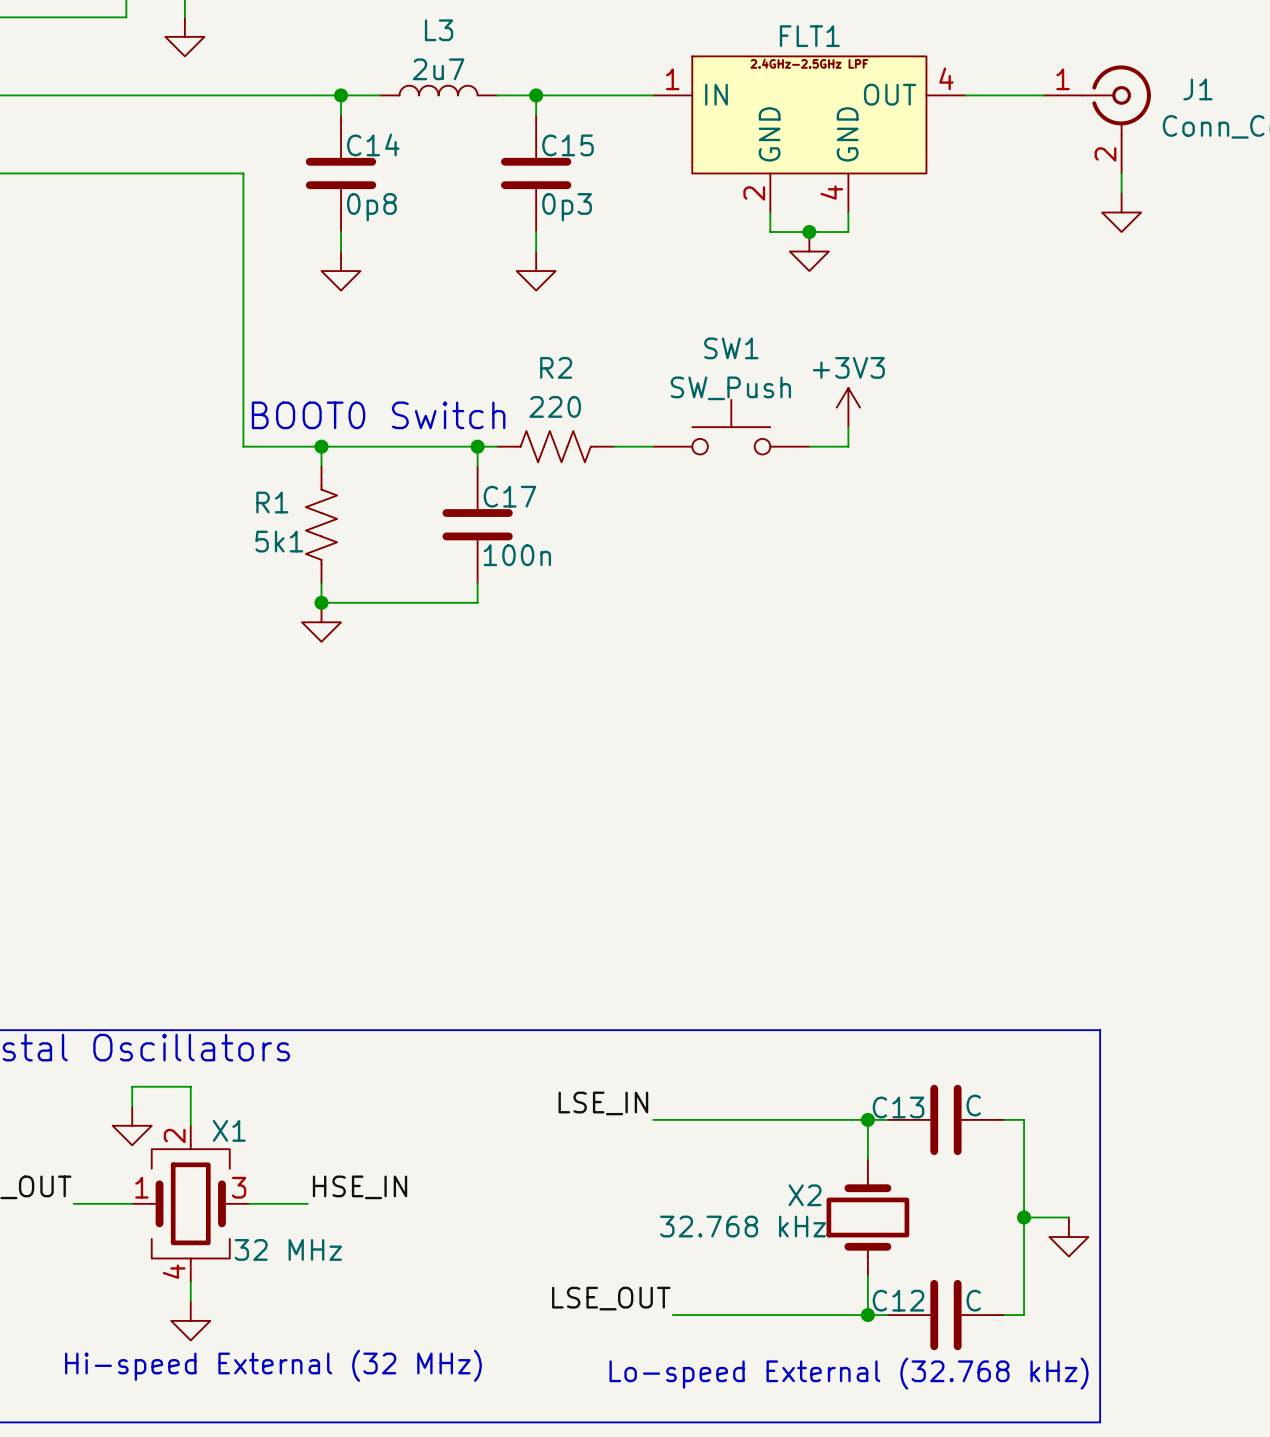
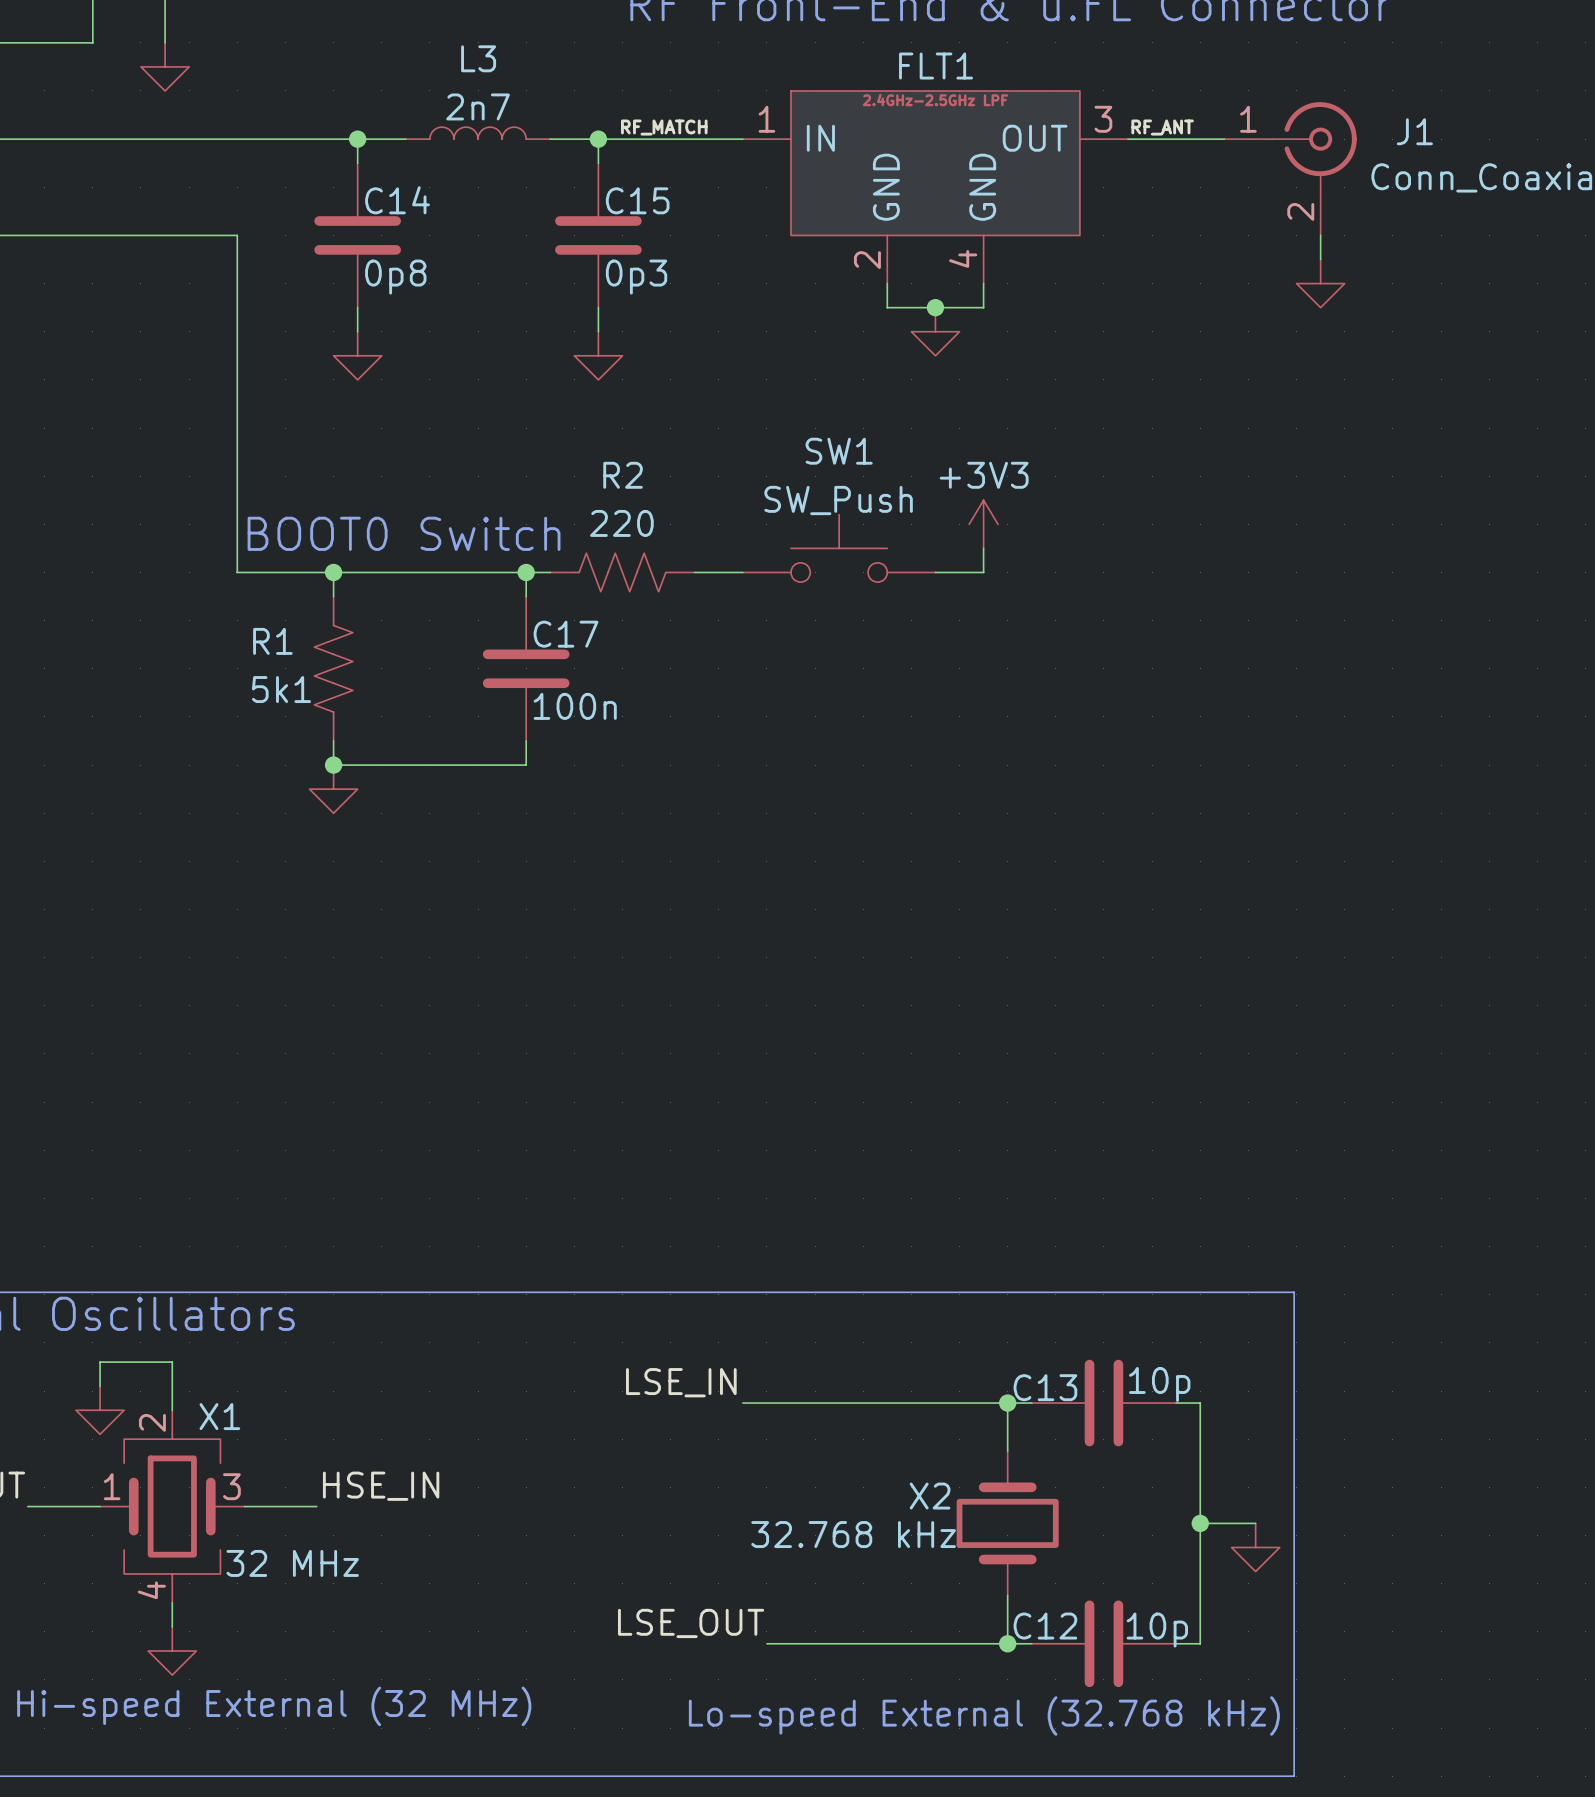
L3 value: 2u7 (438, 69) -> 2n7 (478, 106)
FLT1 pin number: 4 (946, 78) -> 3 (1103, 119)
label: none -> RF_MATCH (664, 127)
label: none -> RF_ANT (1162, 127)
C13 value: C (973, 1105) -> 10p (1159, 1384)
C12 value: C (973, 1300) -> 10p (1157, 1630)

